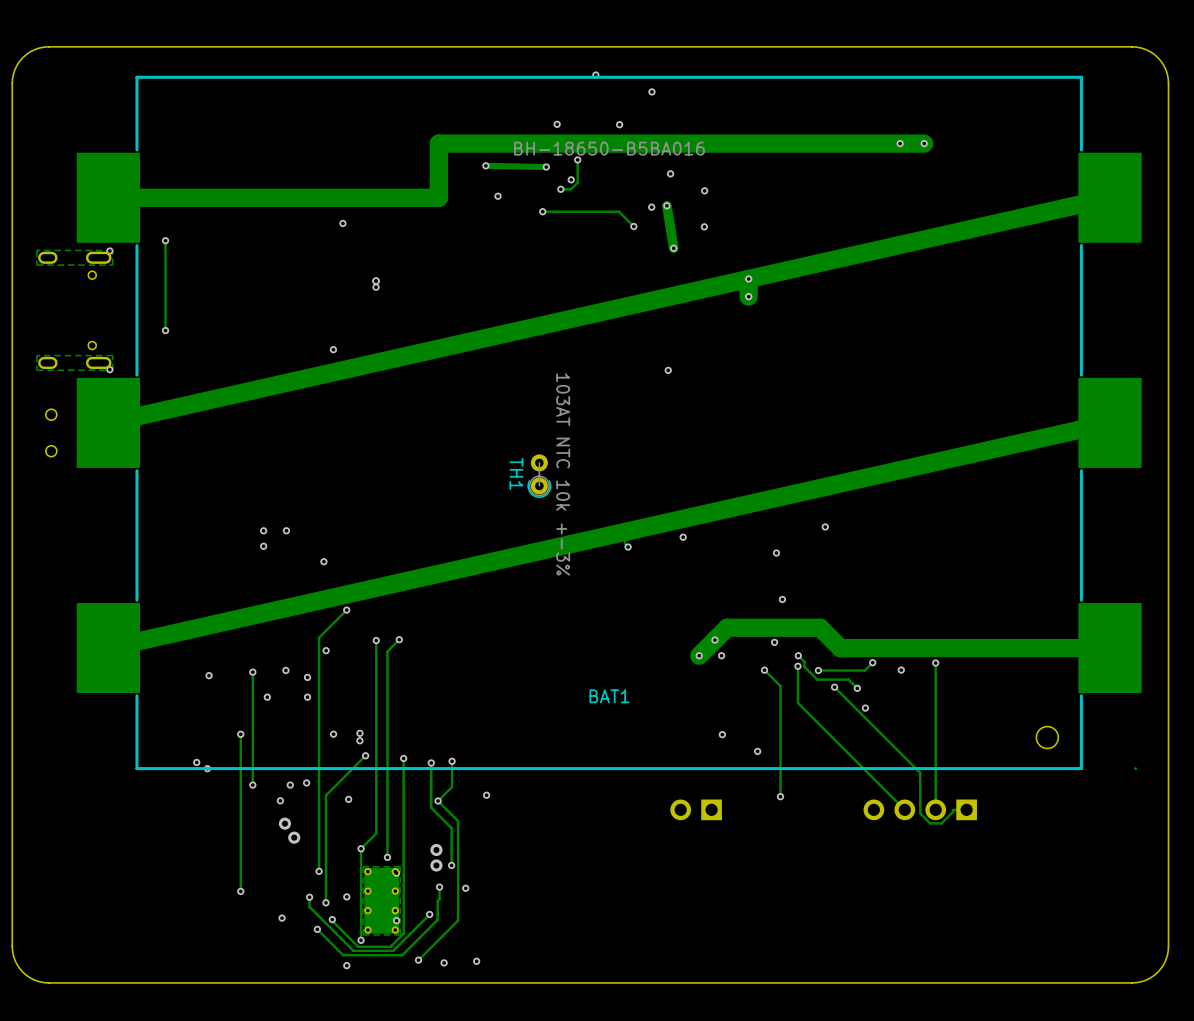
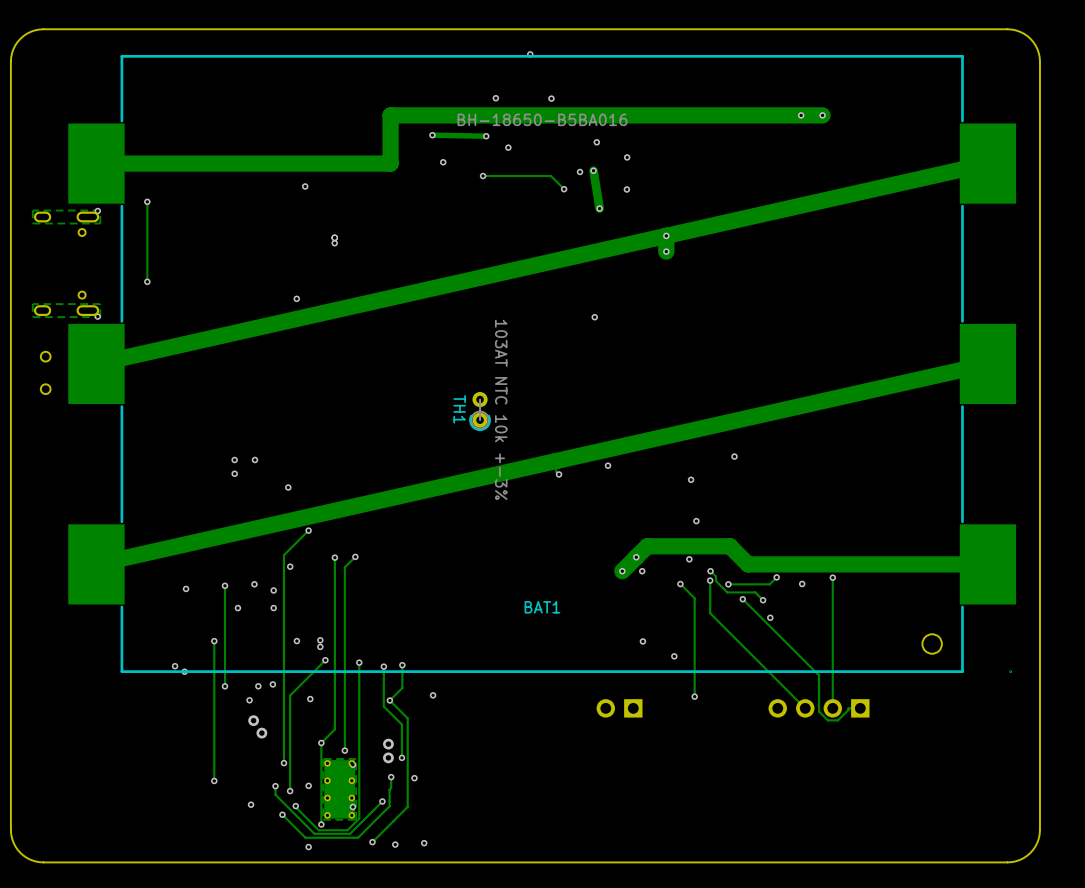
via: (651, 91) -> none
track: (577, 159) (577, 182) (570, 189) (560, 189) -> none
via: (577, 159) -> none
via: (560, 189) -> none

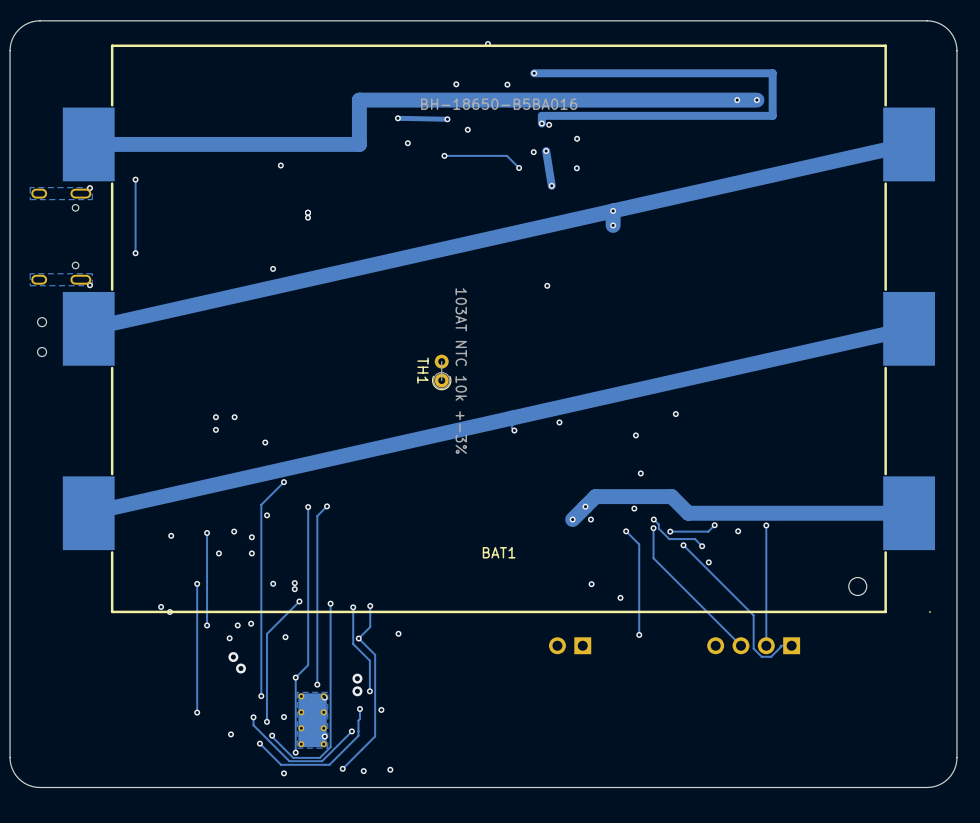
track: none -> (534, 73) (772, 73) (772, 115) (541, 115) (541, 123)
via: none -> (534, 73)
via: none -> (541, 123)

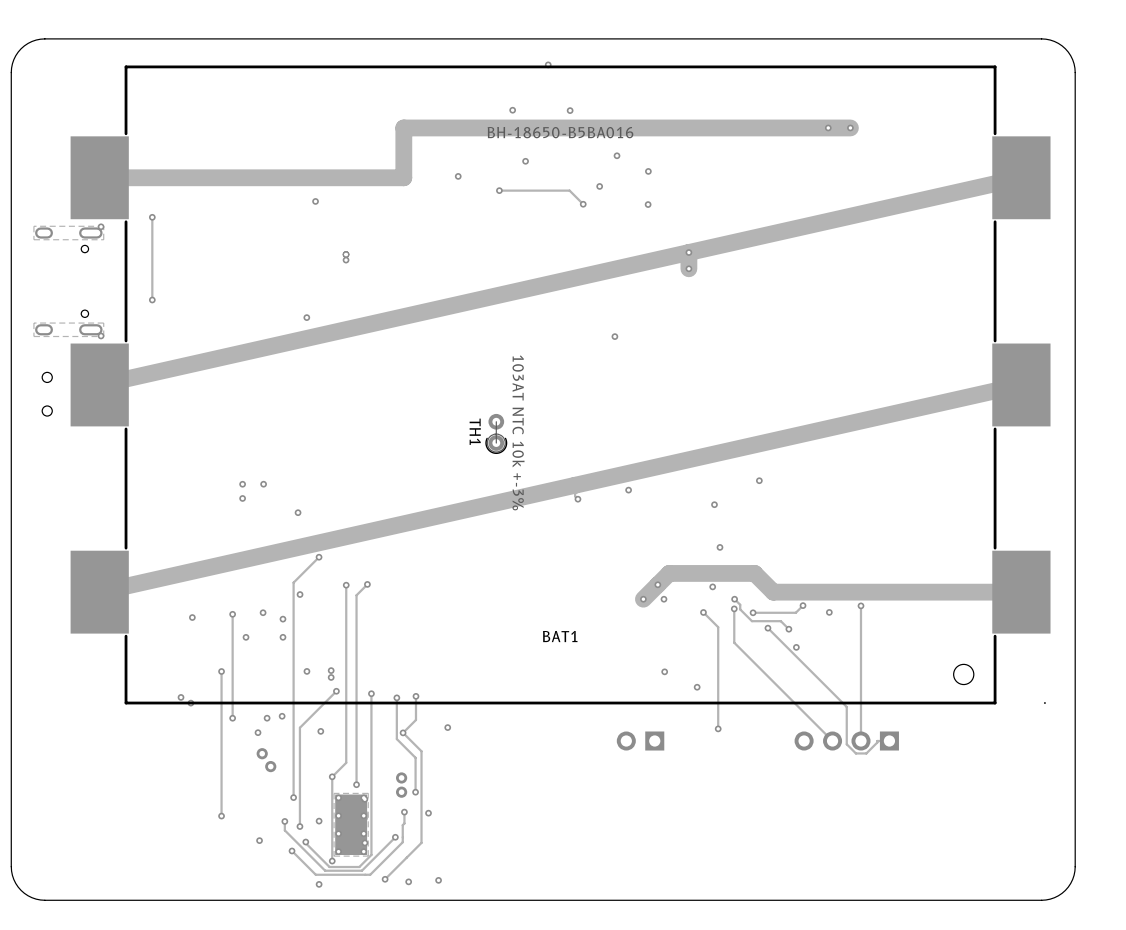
track: (534, 73) (772, 73) (772, 115) (541, 115) (541, 123) -> none
via: (534, 73) -> none
track: (397, 118) (447, 119) -> none
via: (397, 118) -> none
via: (447, 119) -> none
via: (541, 123) -> none
track: (546, 151) (551, 185) -> none
via: (546, 151) -> none
via: (551, 185) -> none

